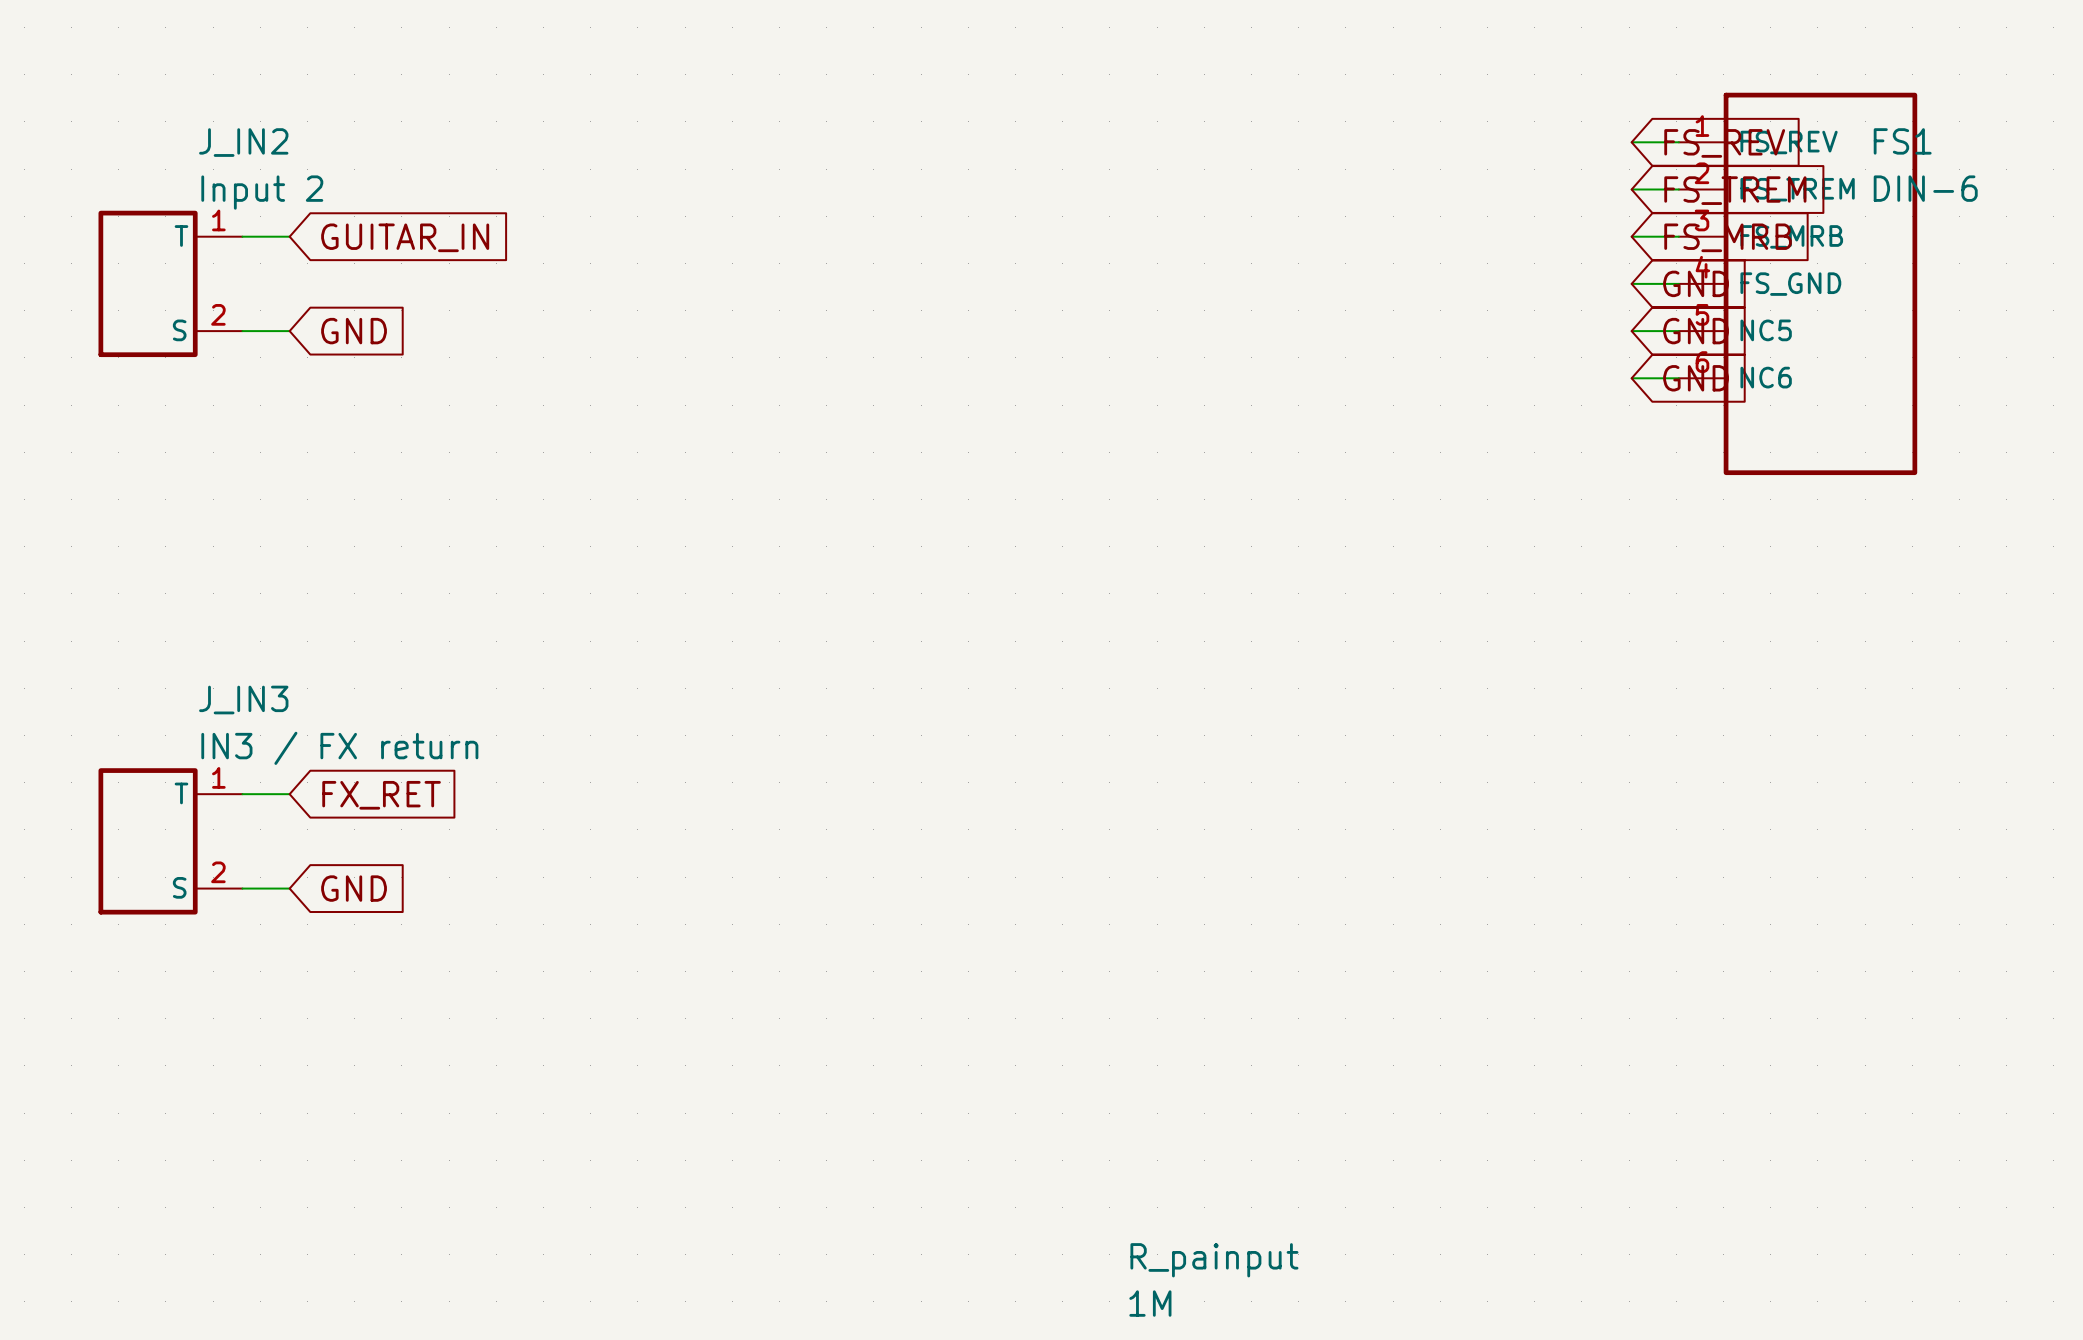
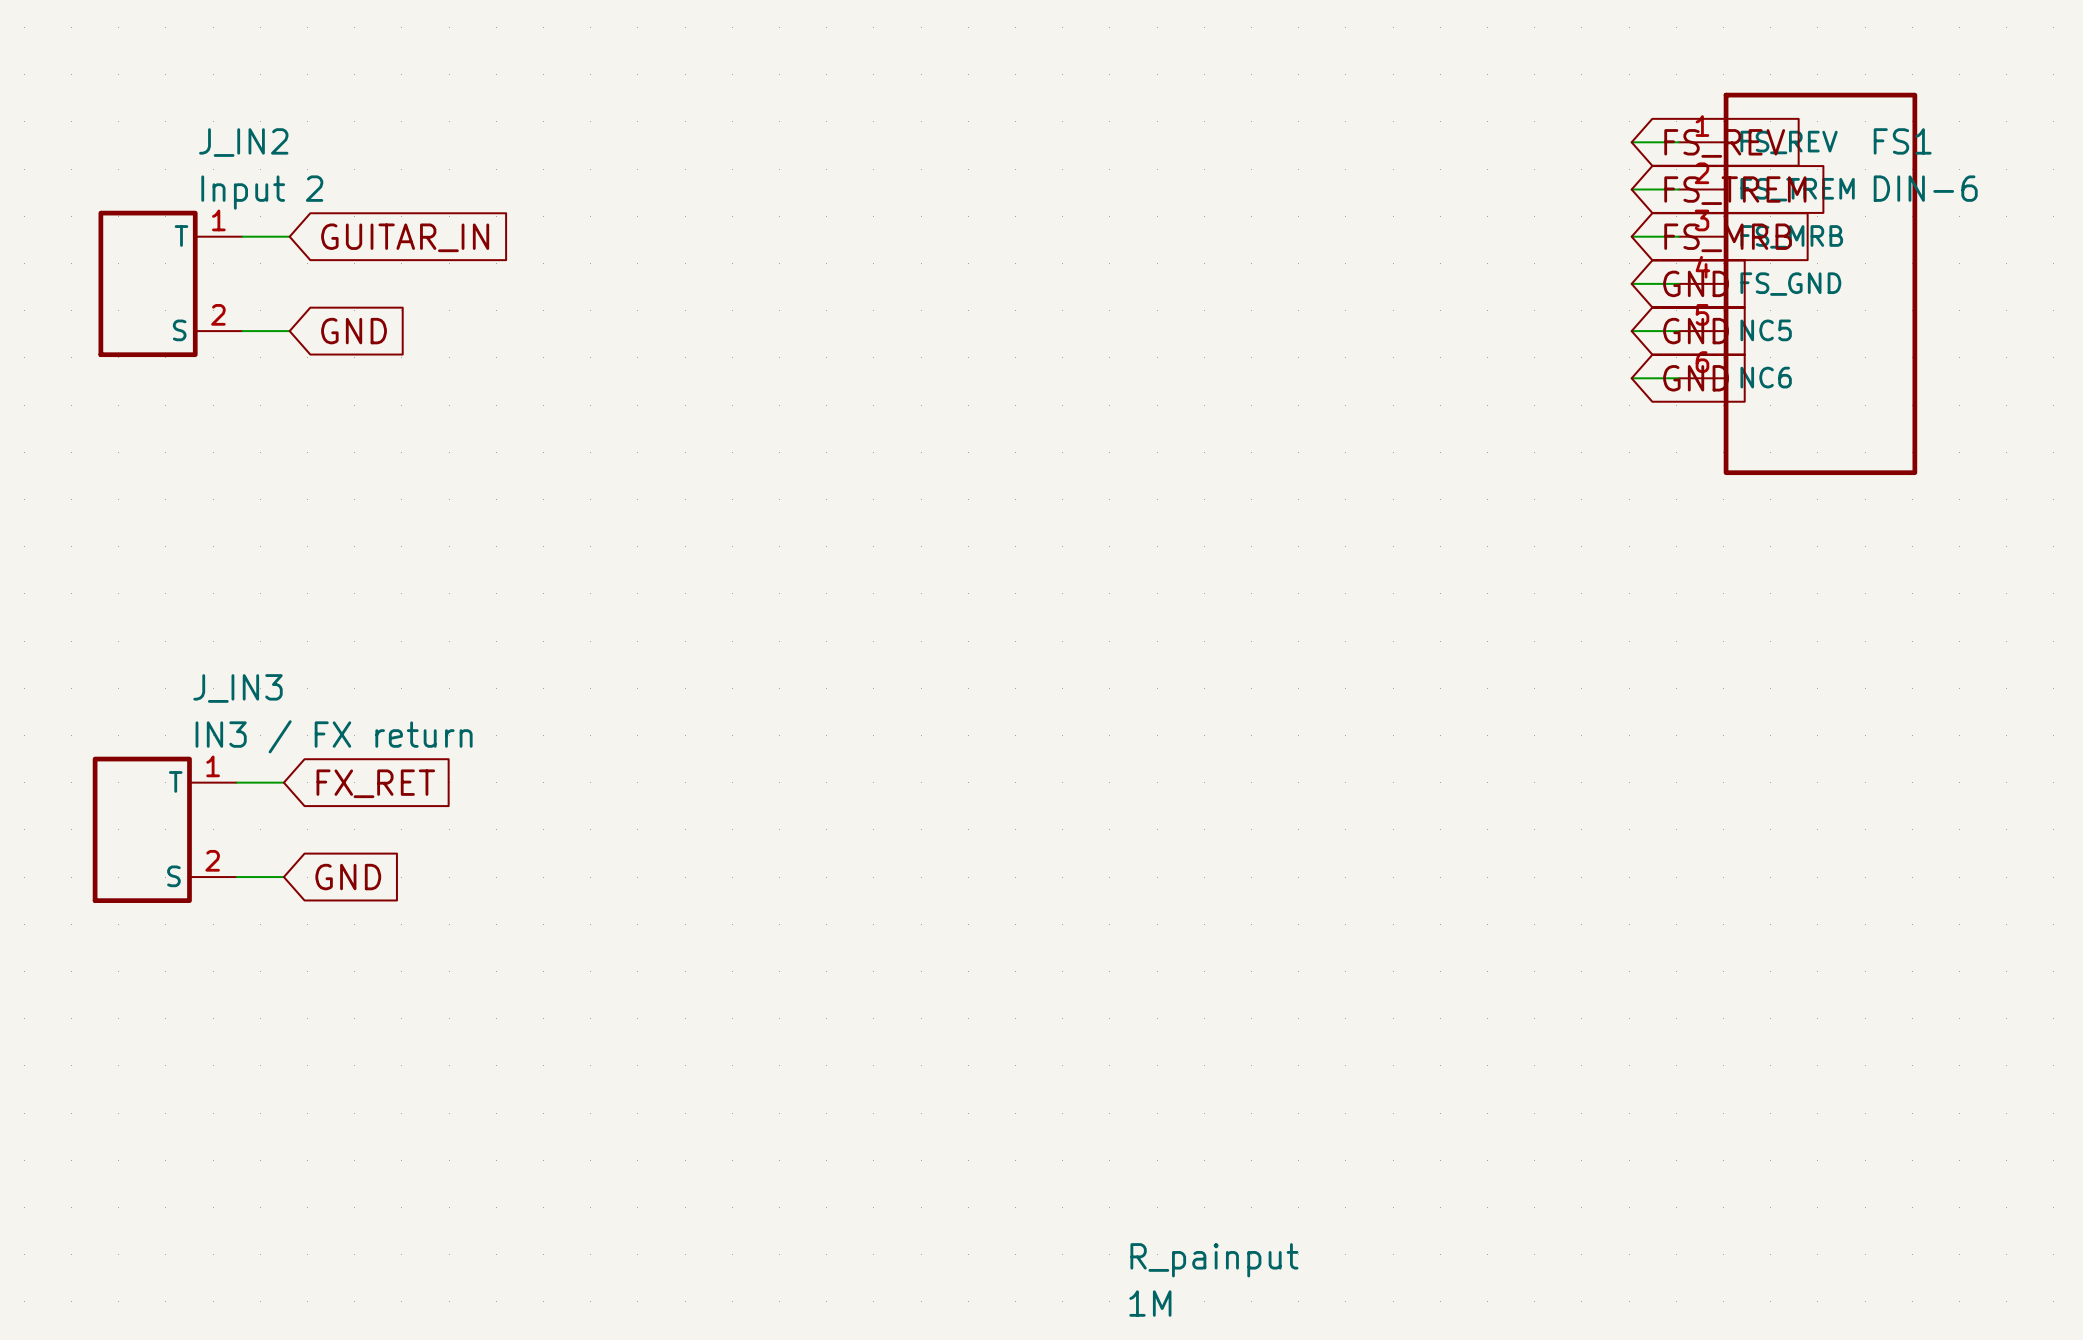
wire: (242, 794) (289, 794) -> (236, 782) (283, 782)
global label position: FX_RET (381, 795) -> FX_RET (375, 783)
J_IN3 position: (170, 841) -> (164, 829)
wire: (242, 888) (289, 888) -> (236, 877) (283, 877)
global label position: GND (354, 888) -> GND (348, 877)

